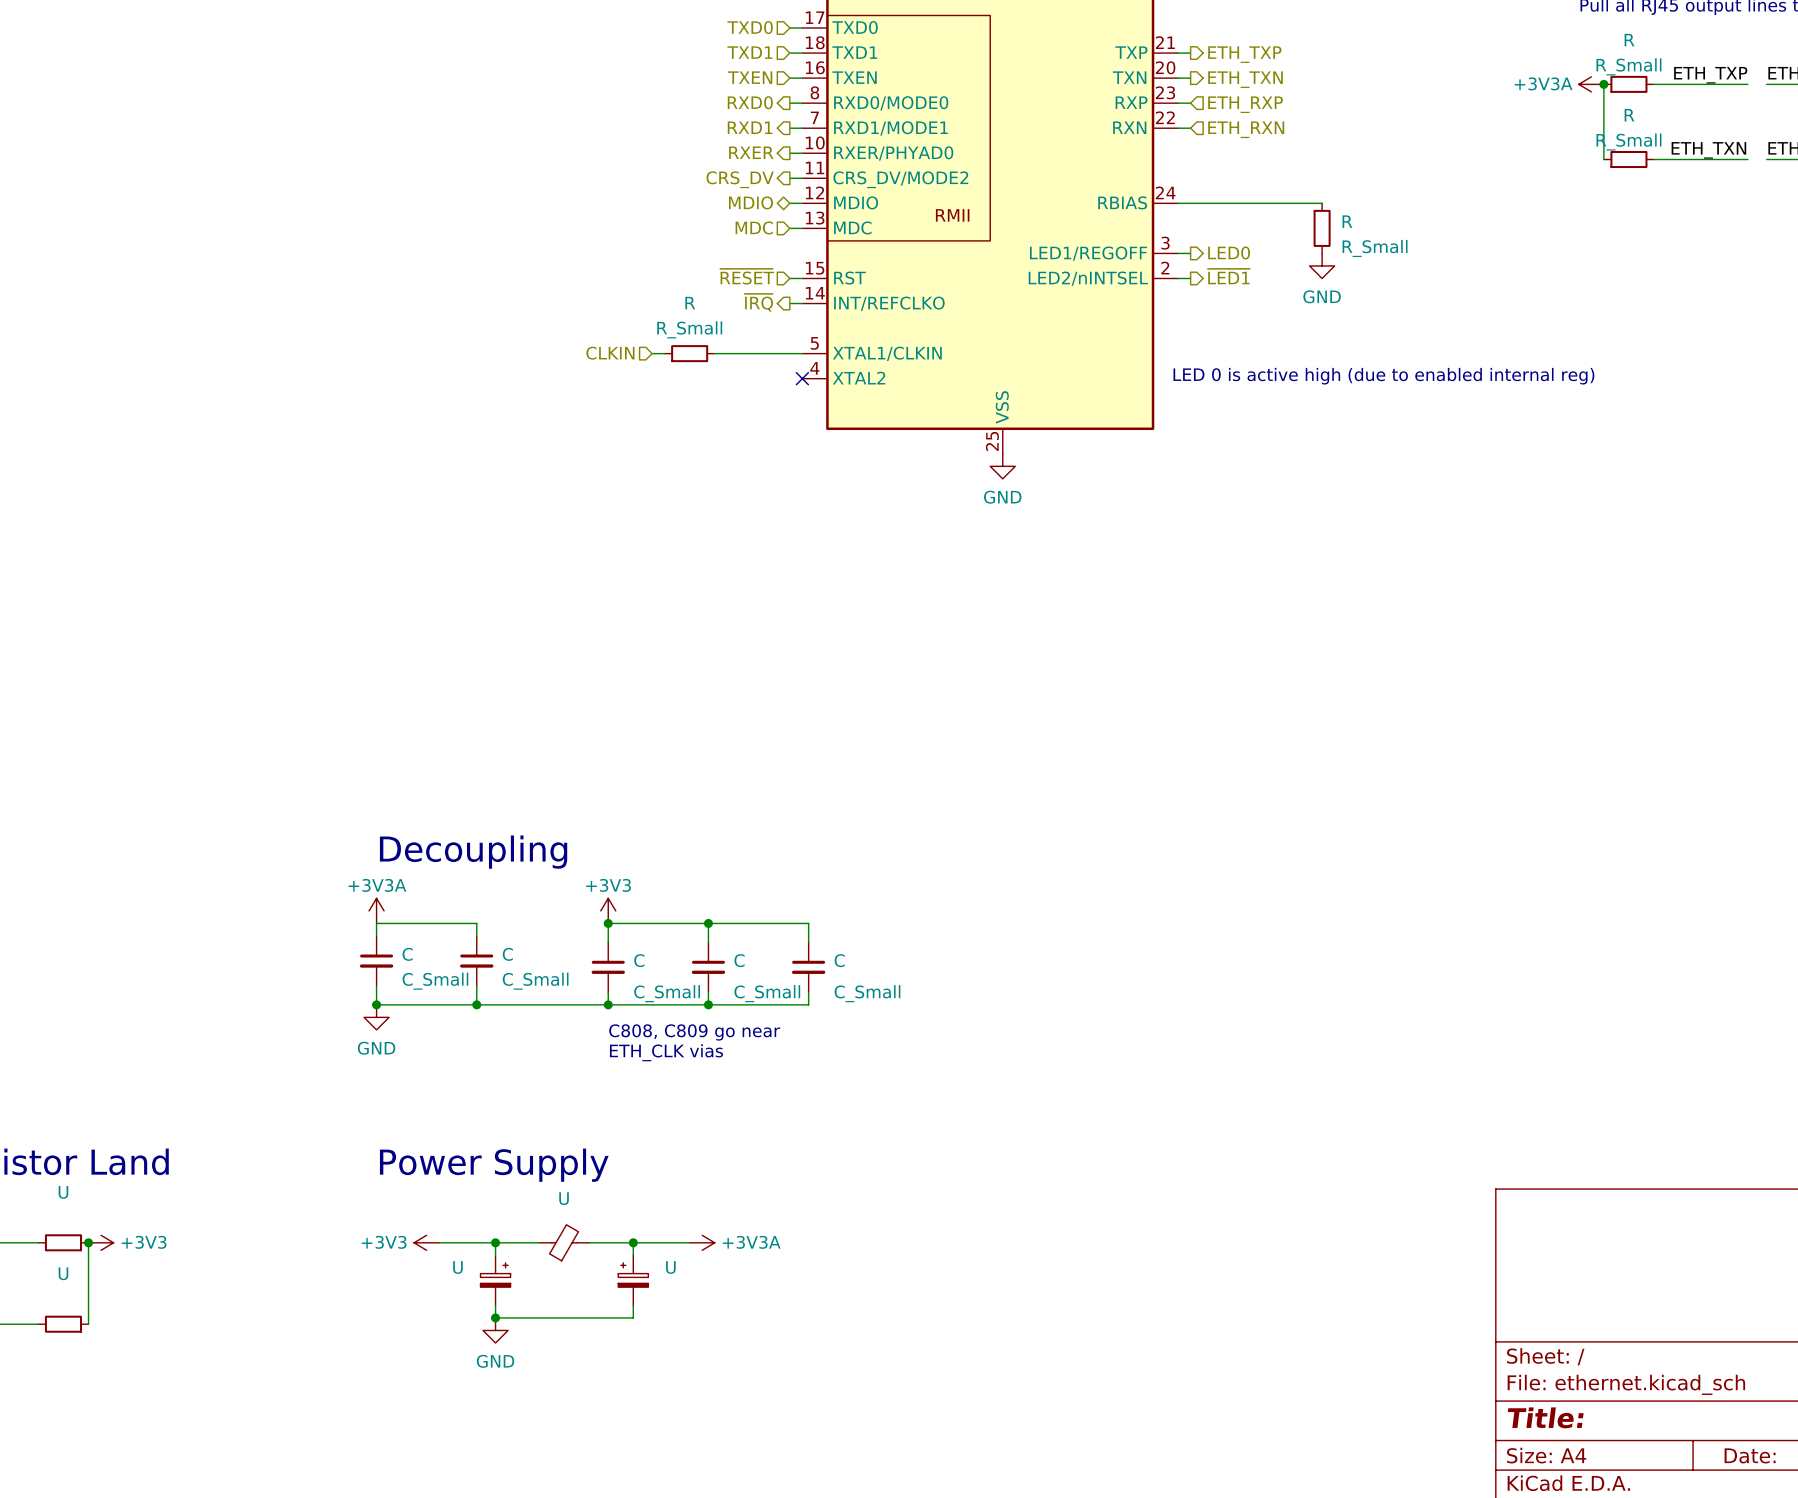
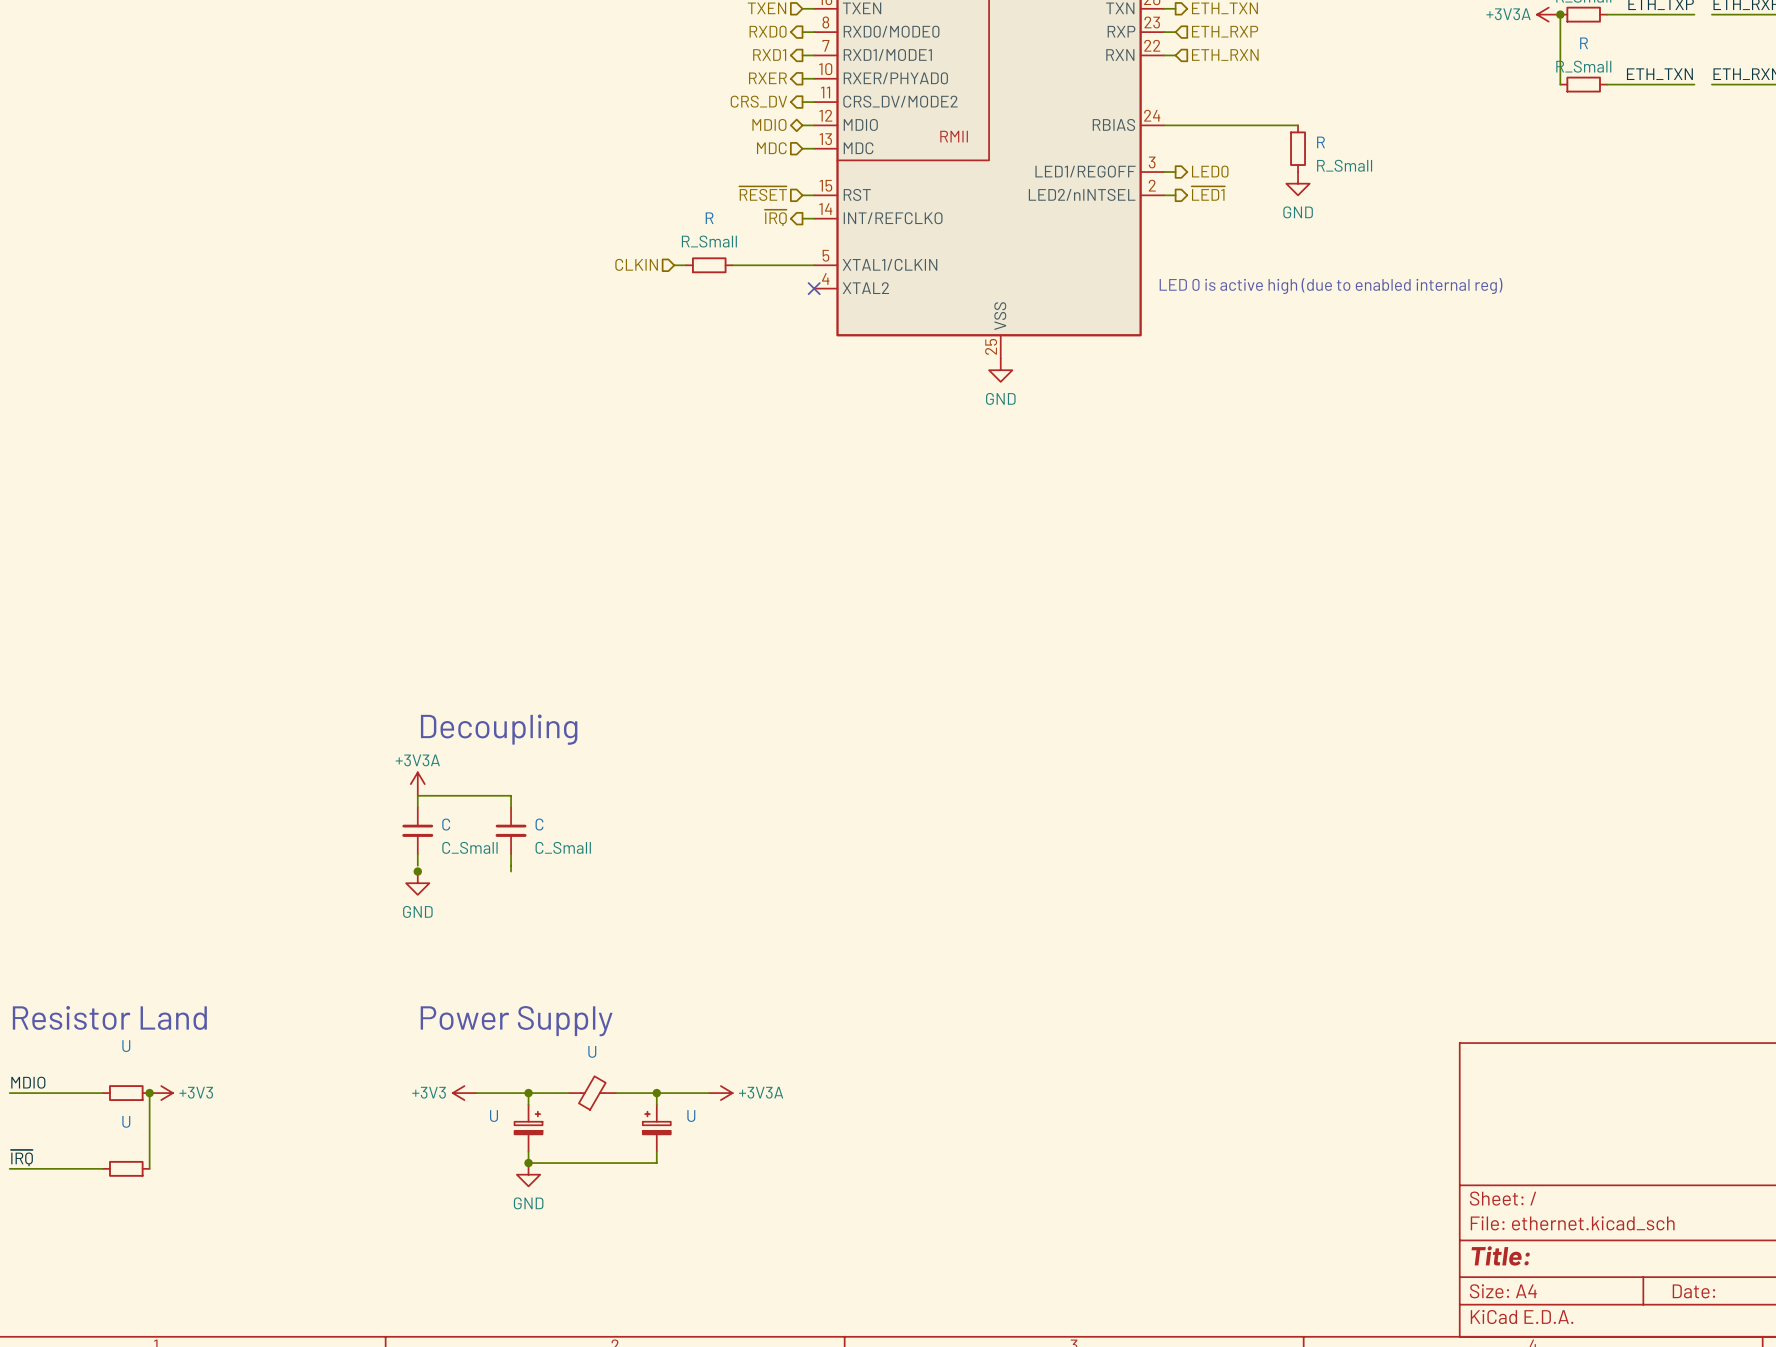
power symbol: +3V3 (608, 910) -> none
junction: (608, 923) -> none
wire: (708, 923) (708, 942) -> none
junction: (708, 923) -> none
wire: (608, 942) (608, 923) (808, 923) (808, 942) -> none
C: C_Small (608, 967) -> none
C: C_Small (708, 967) -> none
C: C_Small (808, 967) -> none
wire: (608, 992) (608, 1004) -> none
wire: (708, 992) (708, 1004) -> none
wire: (808, 992) (808, 1004) (376, 1004) (376, 998) -> none
junction: (476, 1004) -> none
junction: (608, 1004) -> none
junction: (708, 1004) -> none
text: C808, C809 go near (694, 1032) -> none
text: ETH_CLK vias (666, 1052) -> none

